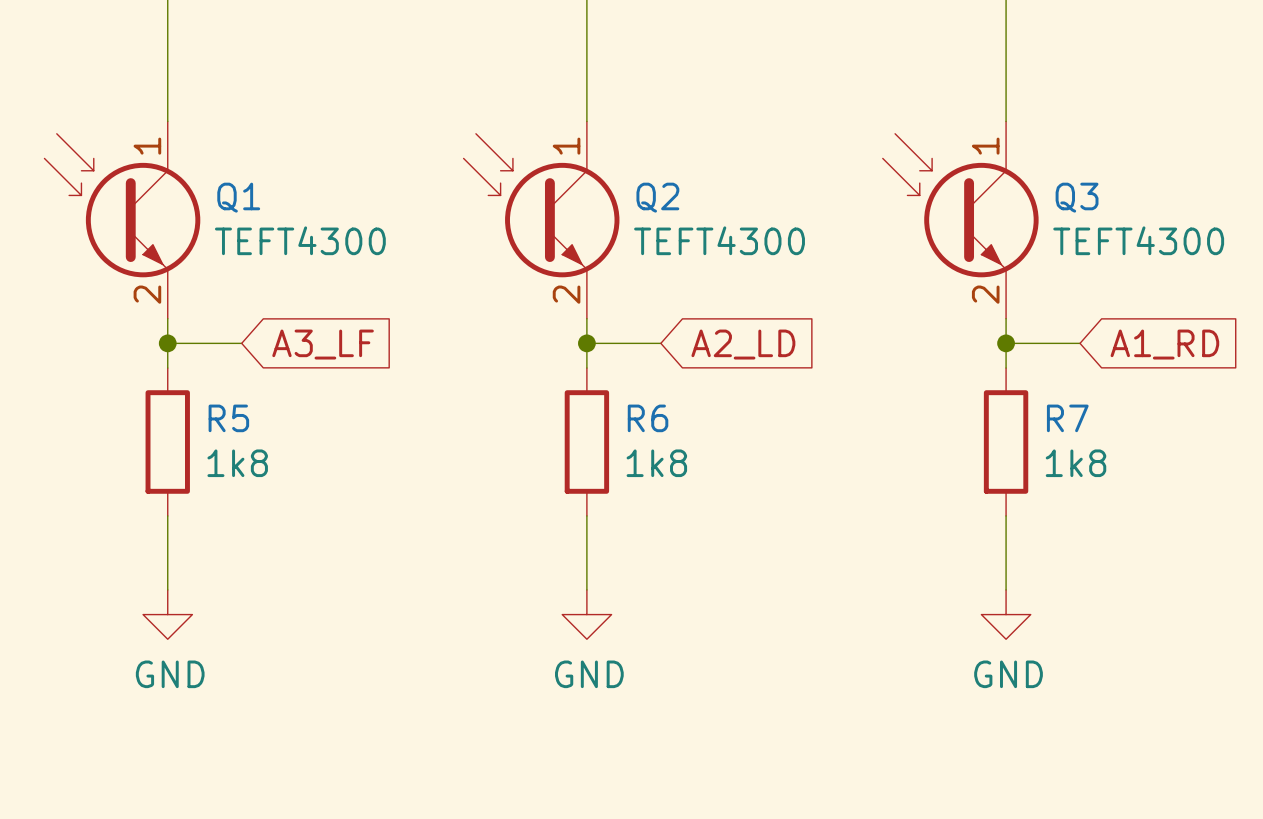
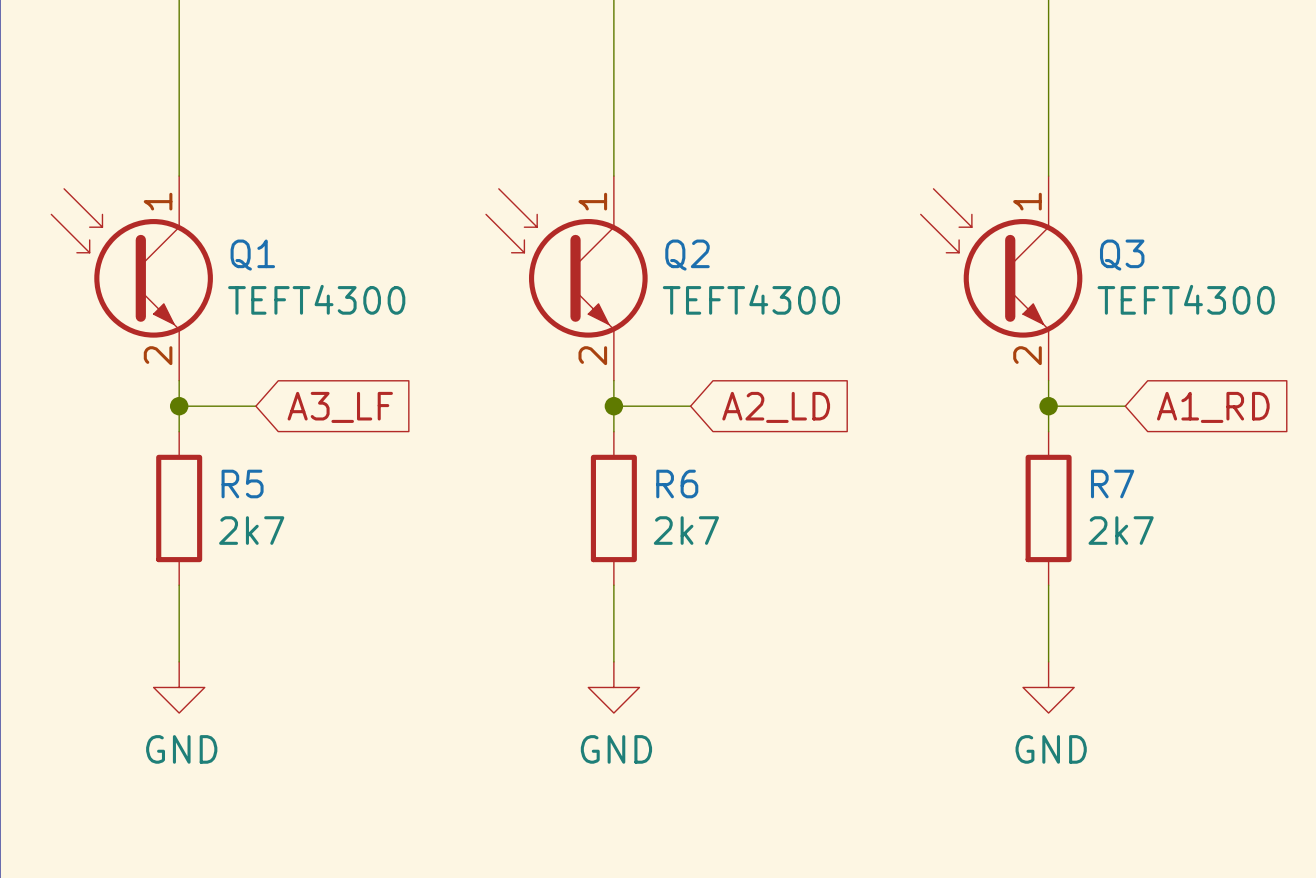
R5 value: 1k8 (237, 463) -> 2k7 (251, 530)
R6 value: 1k8 (656, 463) -> 2k7 (686, 530)
R7 value: 1k8 (1075, 463) -> 2k7 (1121, 530)

